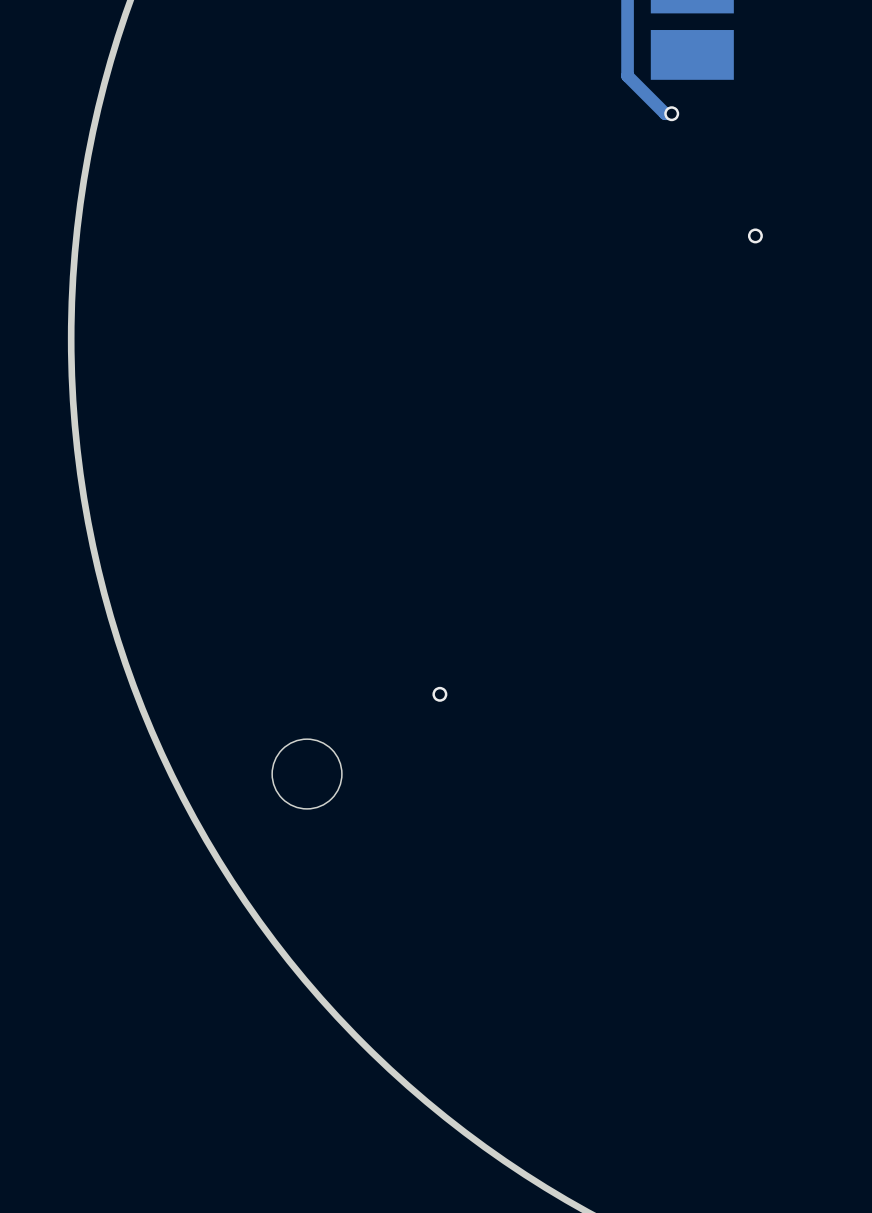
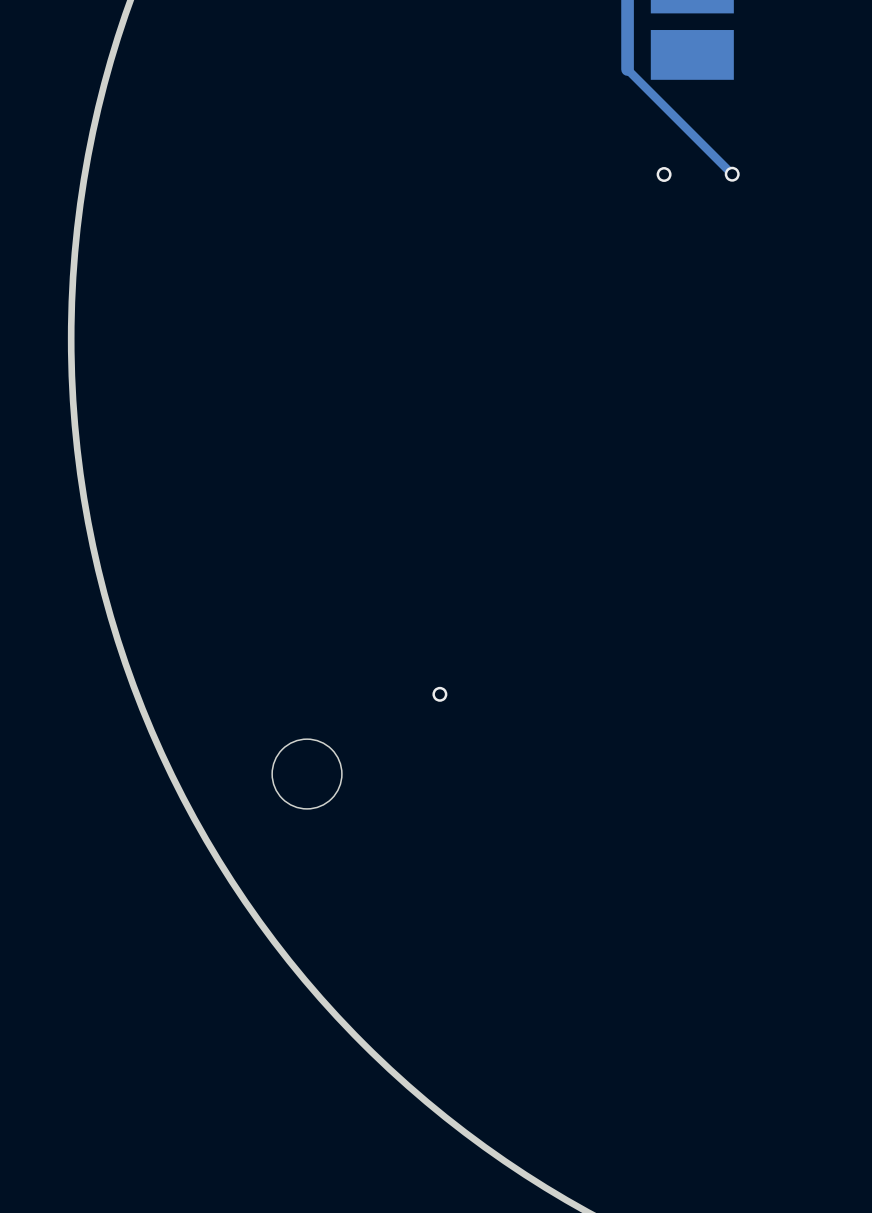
track: (627, 69) (627, 76) (665, 113) (671, 113) -> (627, 69) (732, 174)
via: (671, 113) -> none
via: none -> (664, 174)
via: none -> (732, 174)
via: (755, 235) -> none

